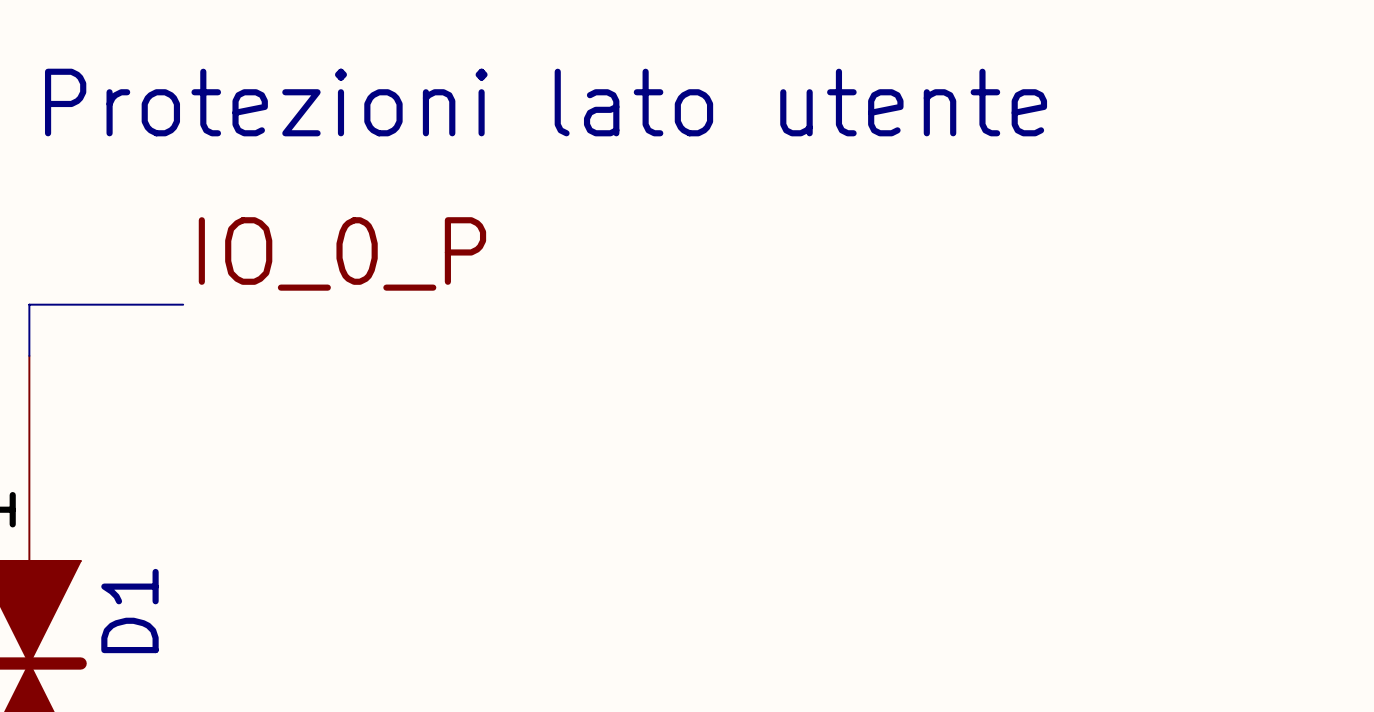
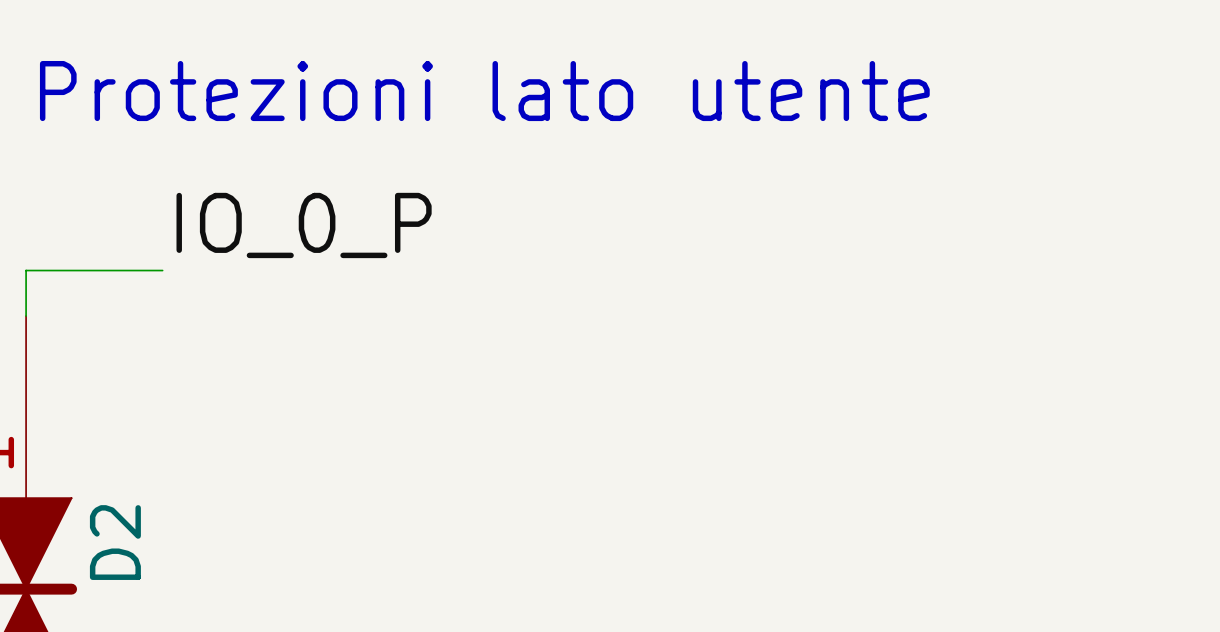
D1 name: D1 (129, 611) -> D2 (115, 542)

